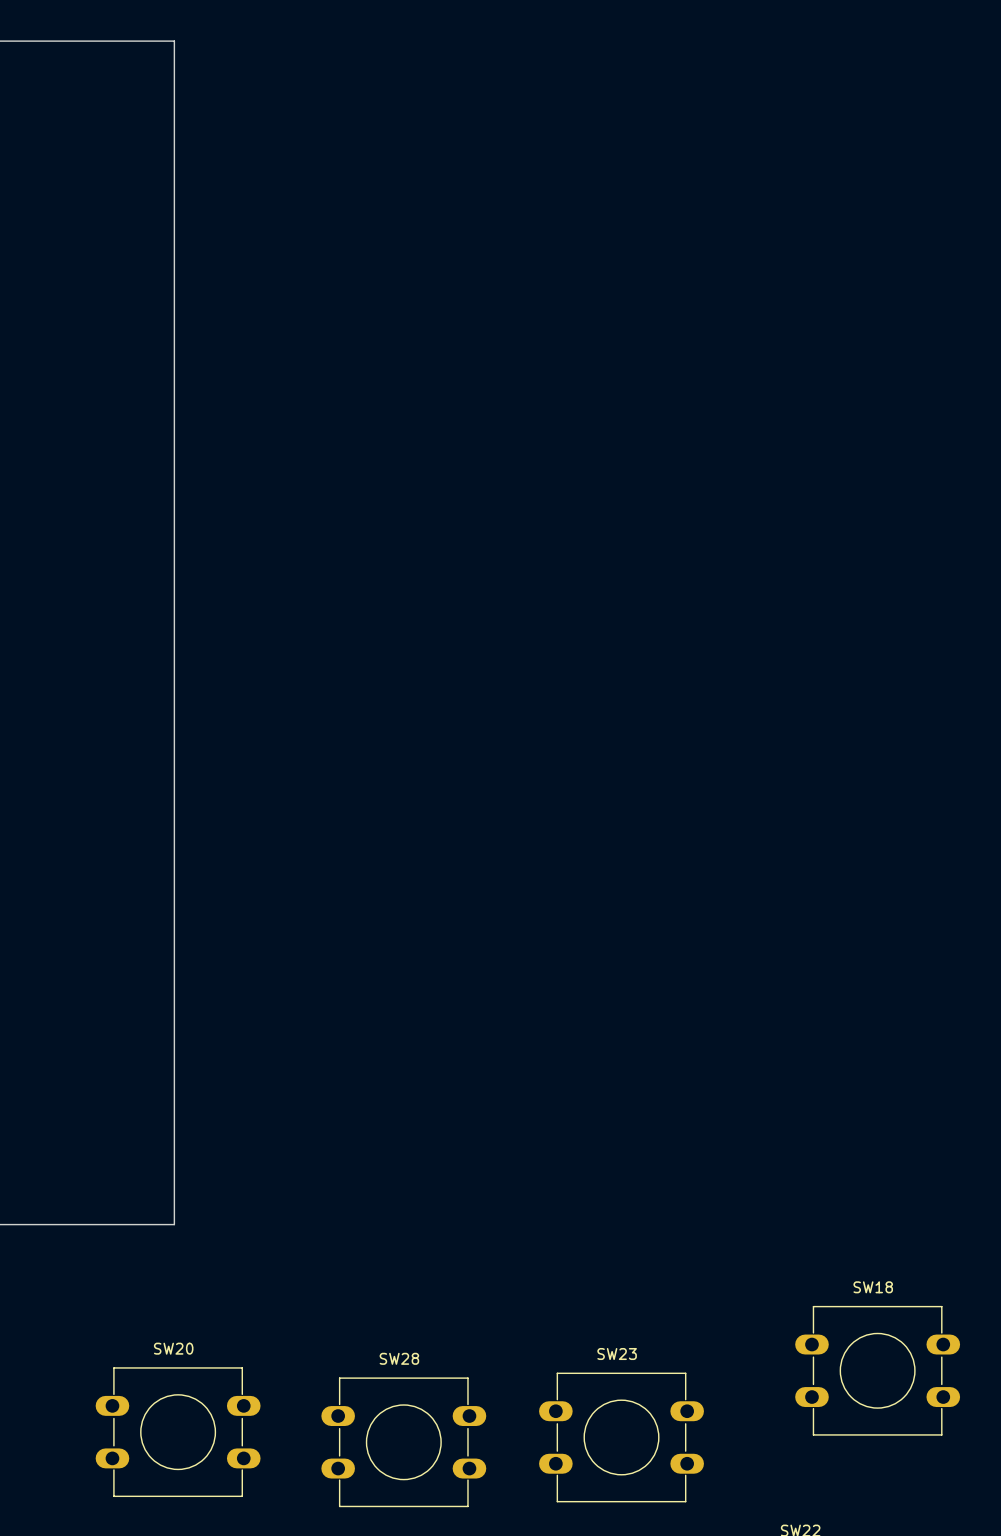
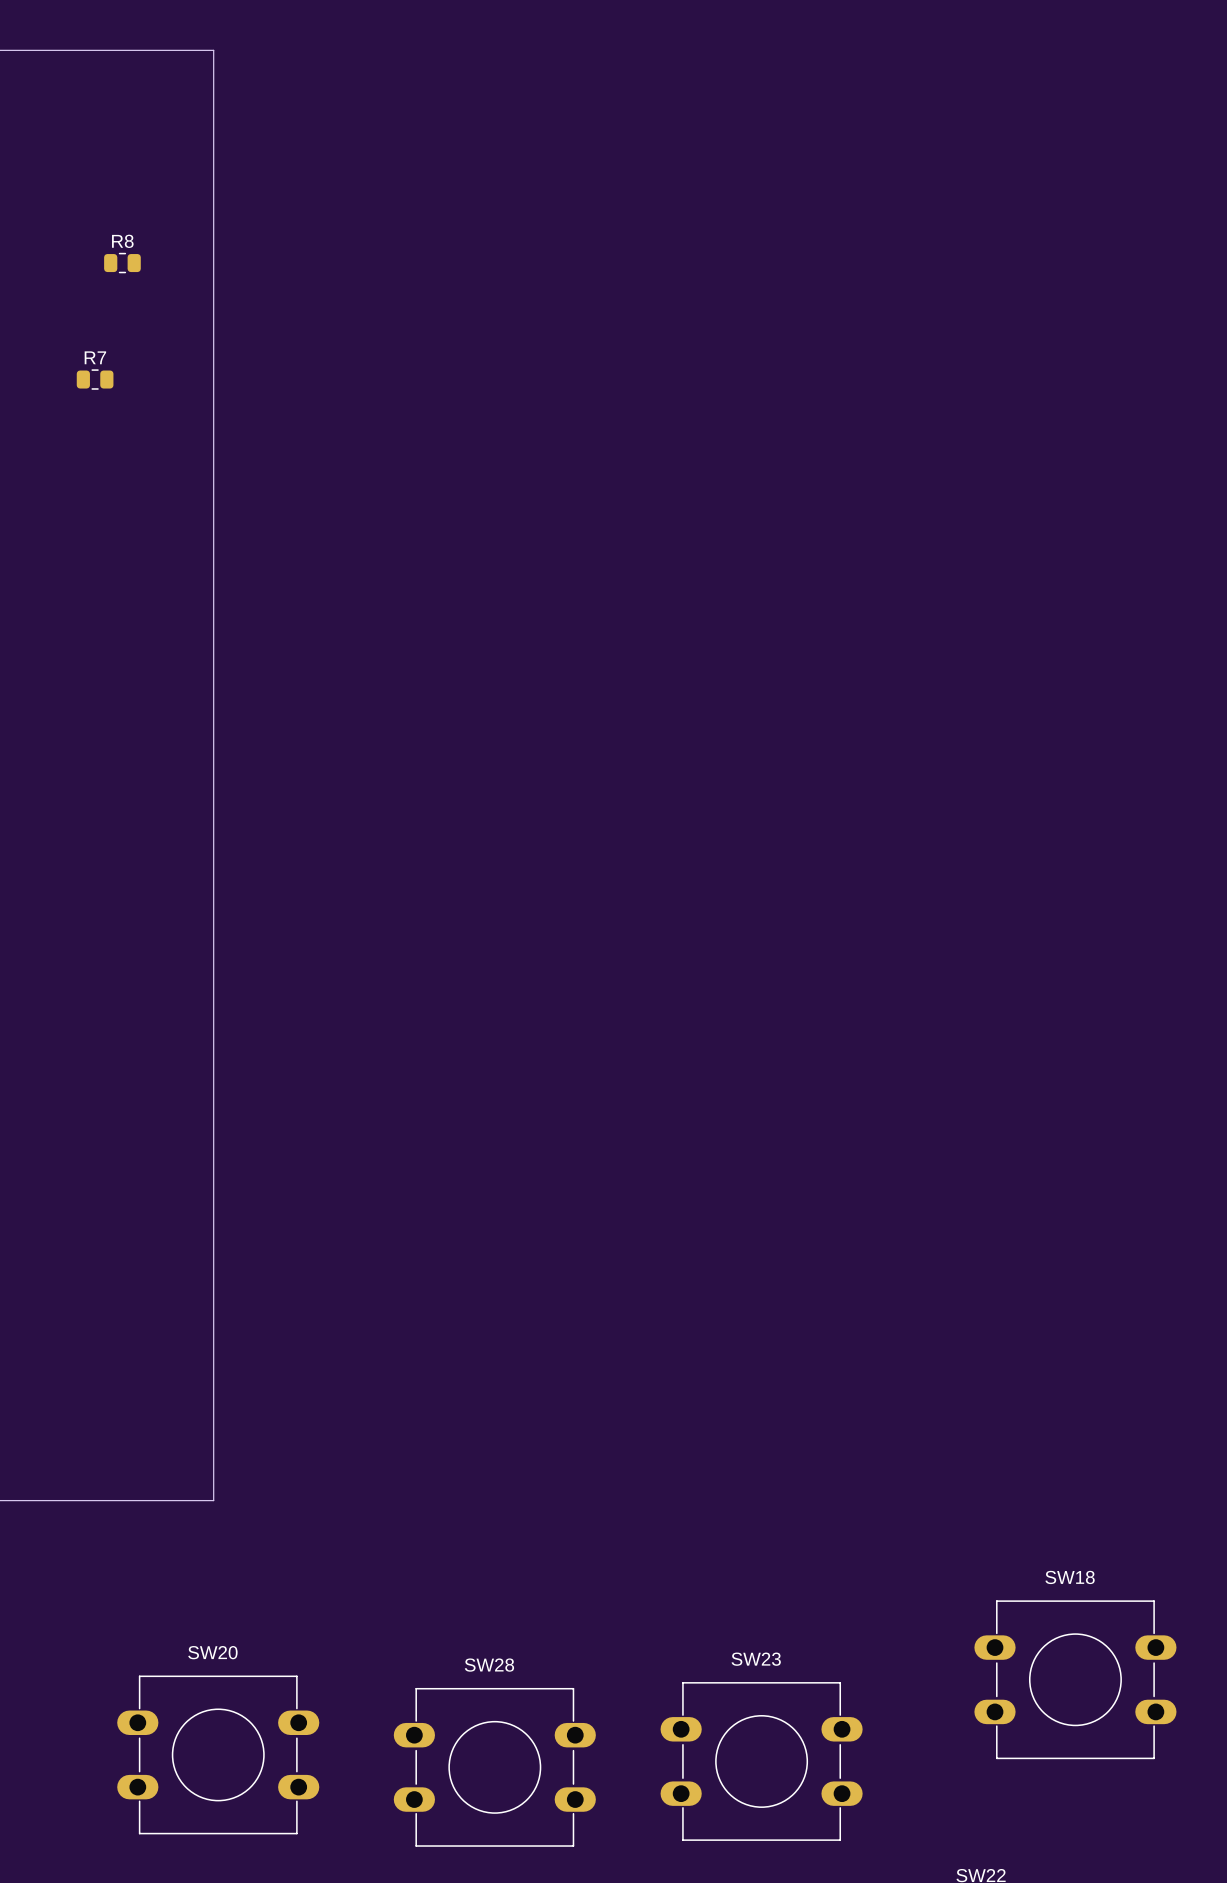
R8: none -> (122, 263)
R7: none -> (95, 379)

